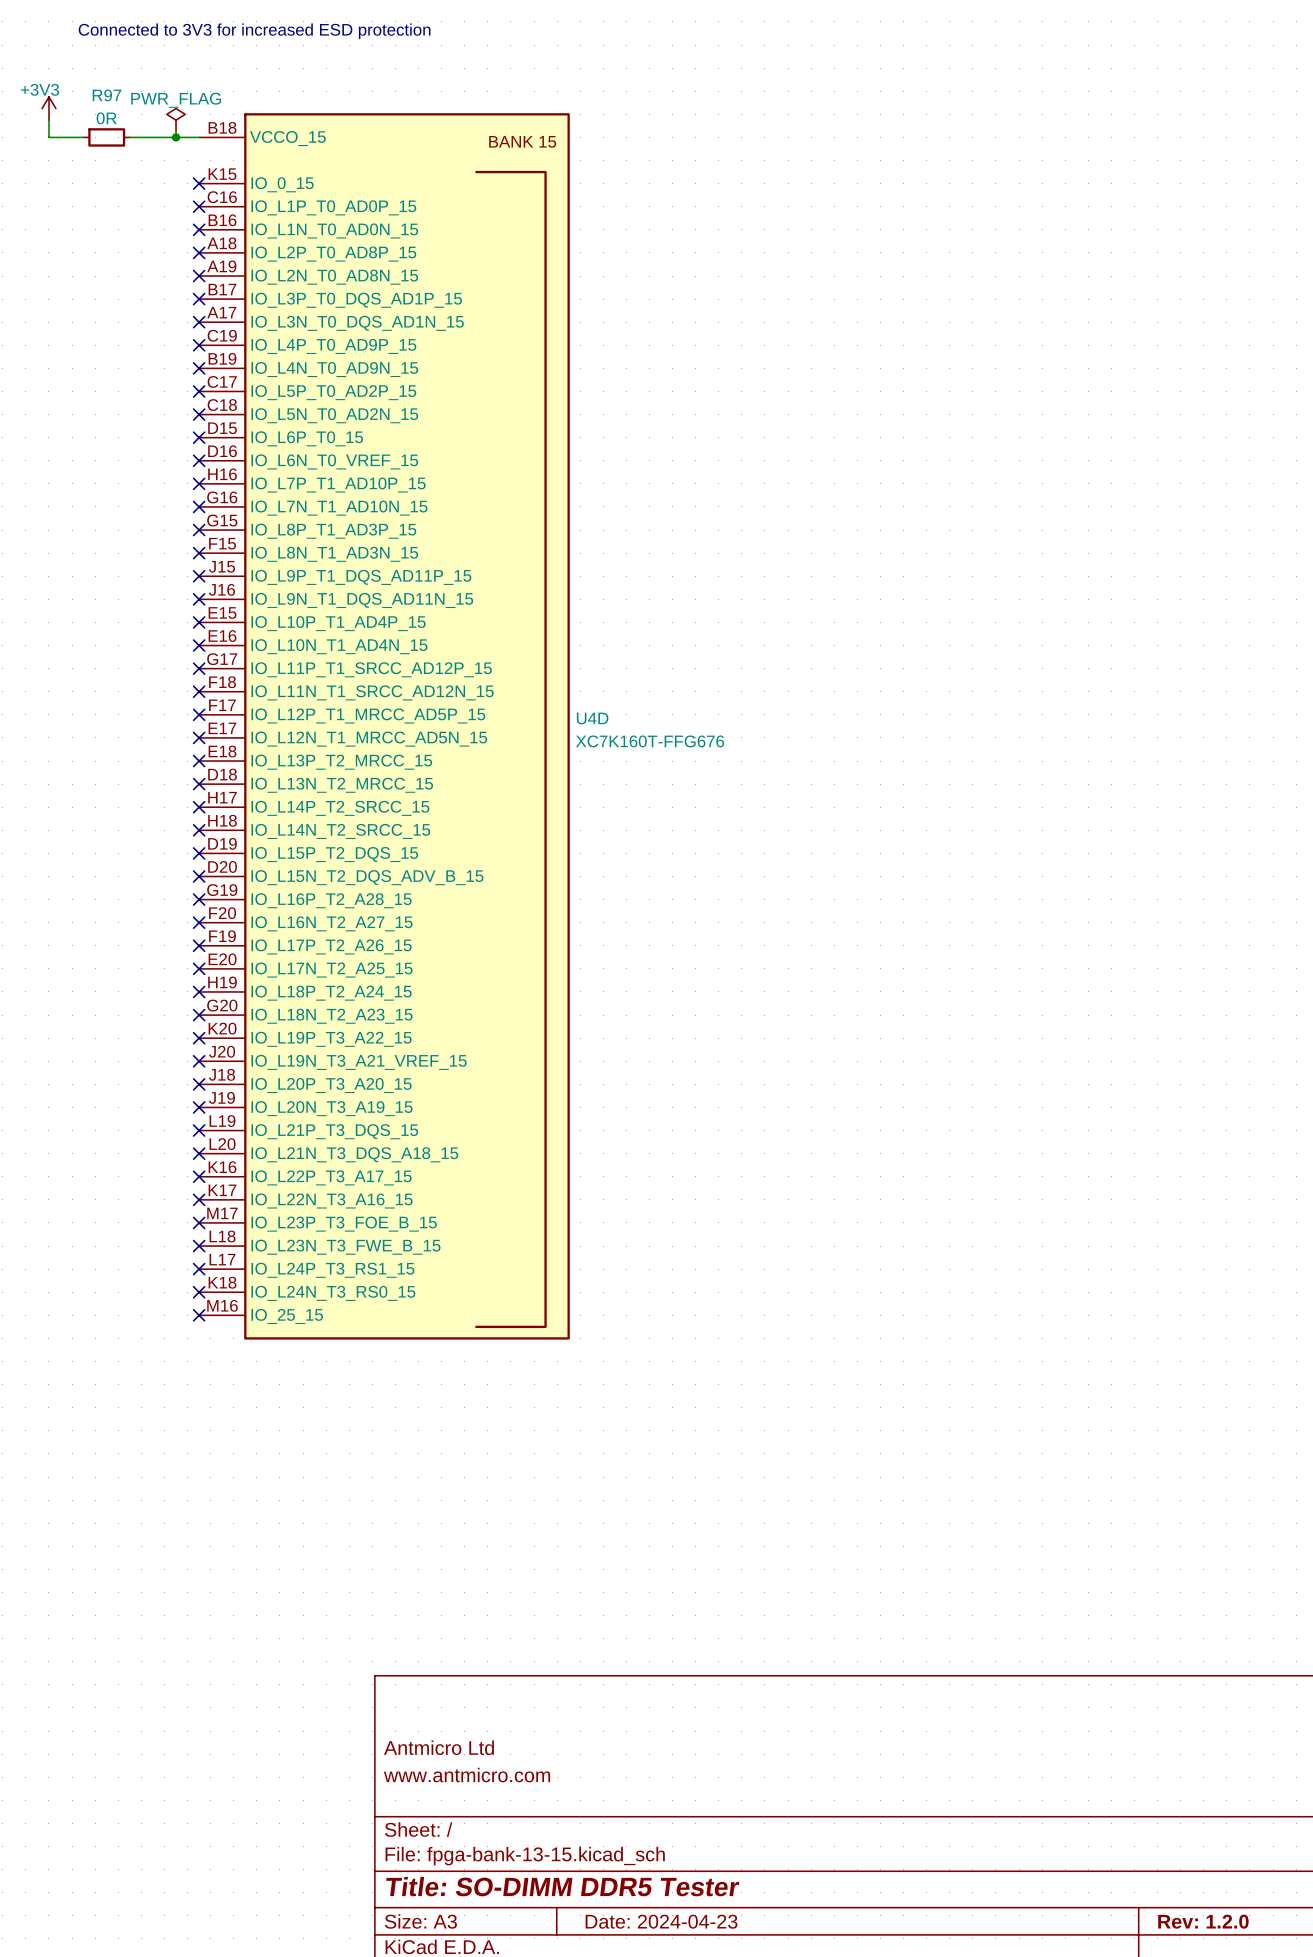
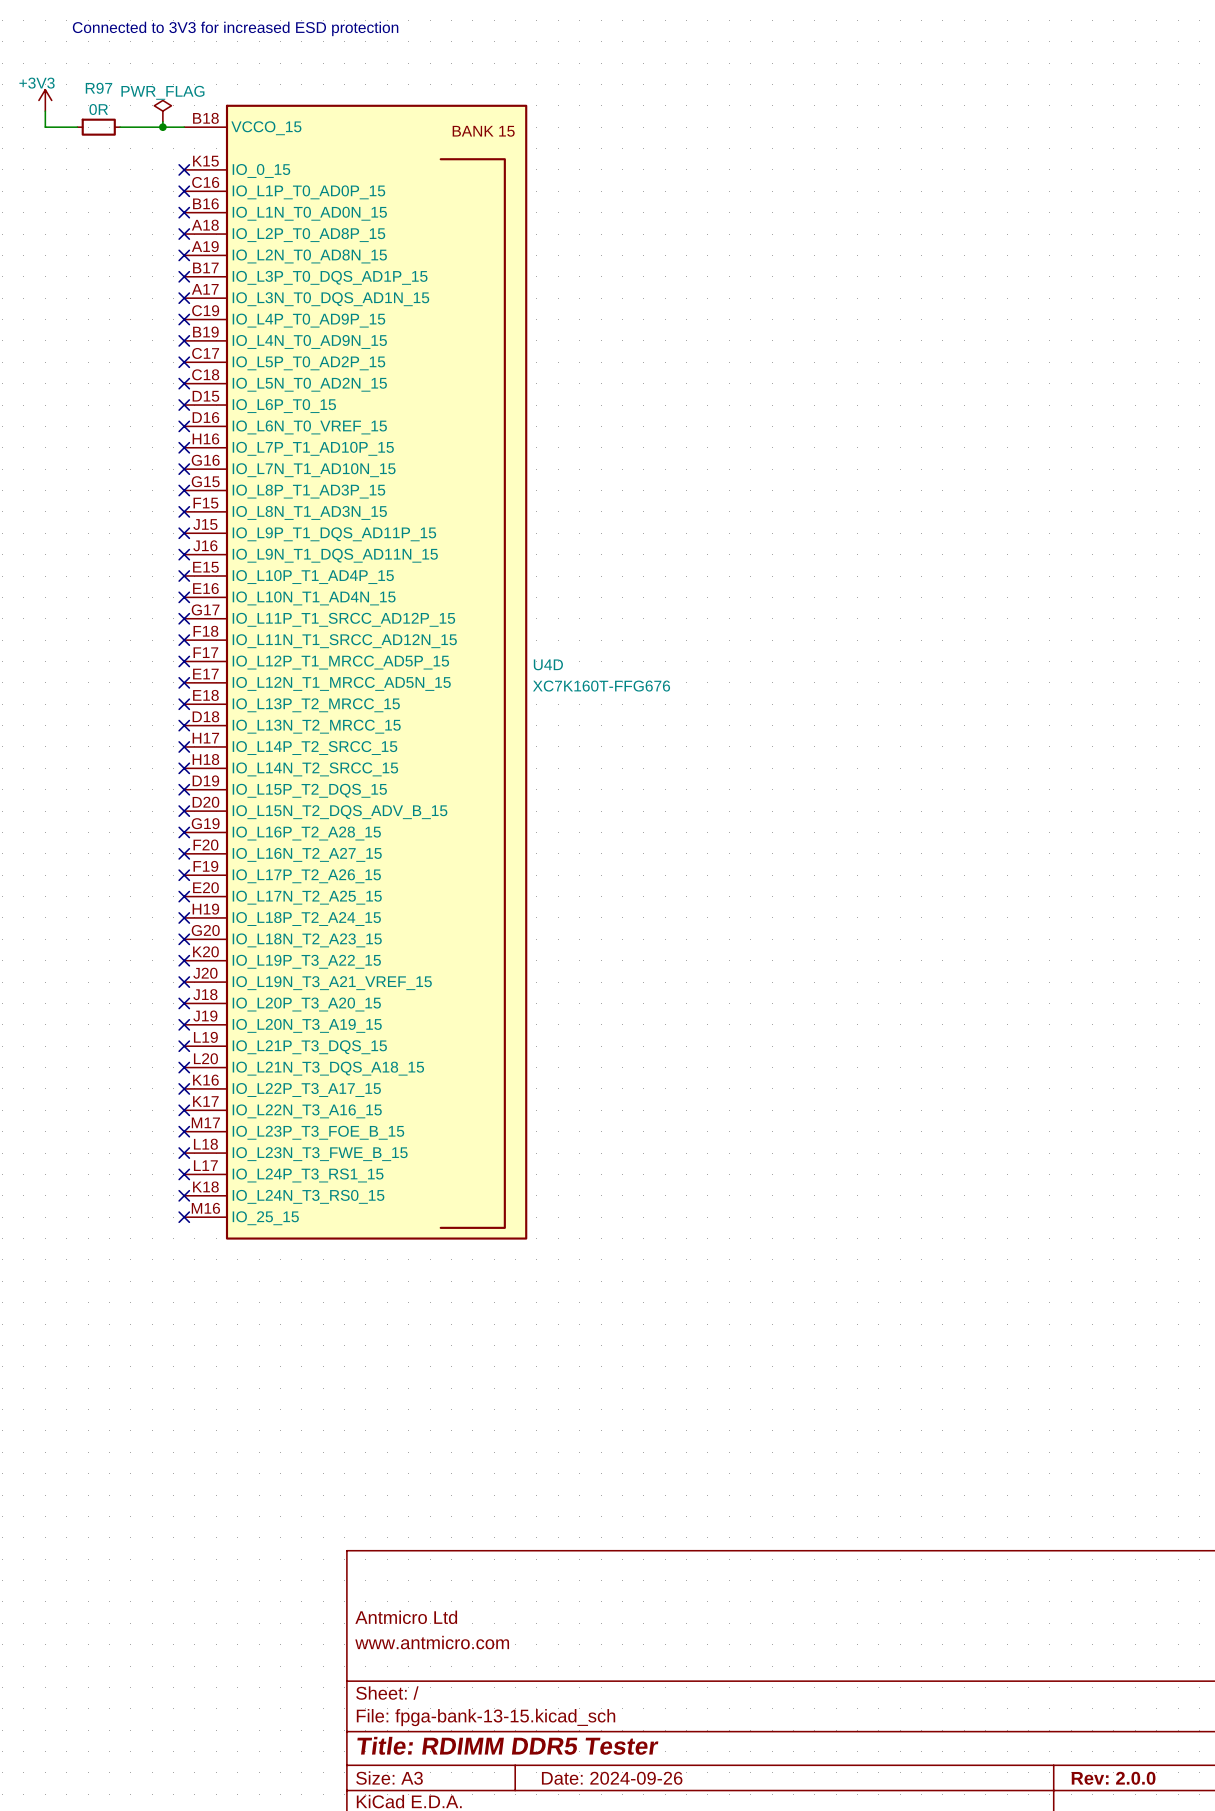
title block: Title: SO-DIMM DDR5 Tester (562, 1886) -> Title: RDIMM DDR5 Tester (507, 1745)
title block: Date: 2024-04-23 (661, 1921) -> Date: 2024-09-26 (612, 1778)
title block: Rev: 1.2.0 (1203, 1921) -> Rev: 2.0.0 (1113, 1778)

